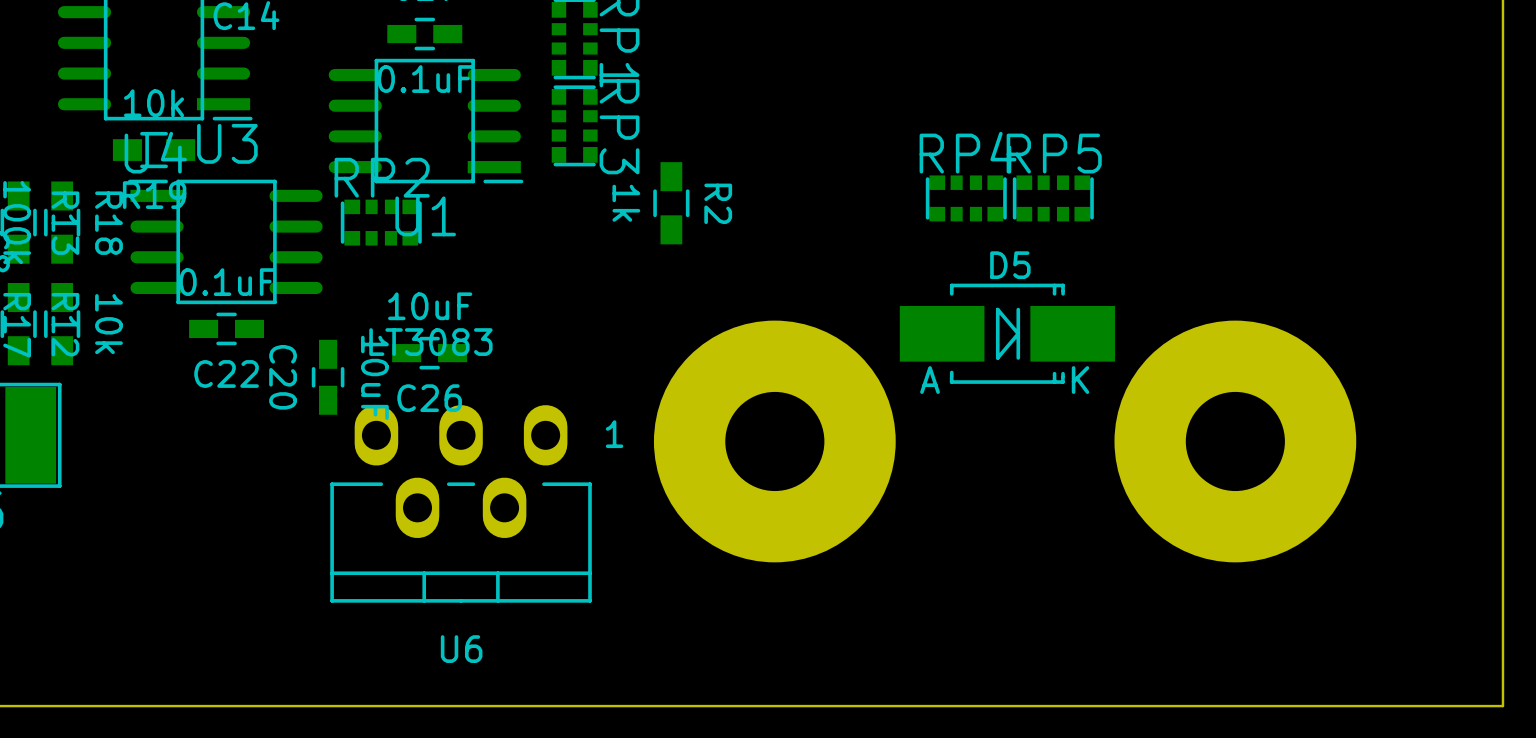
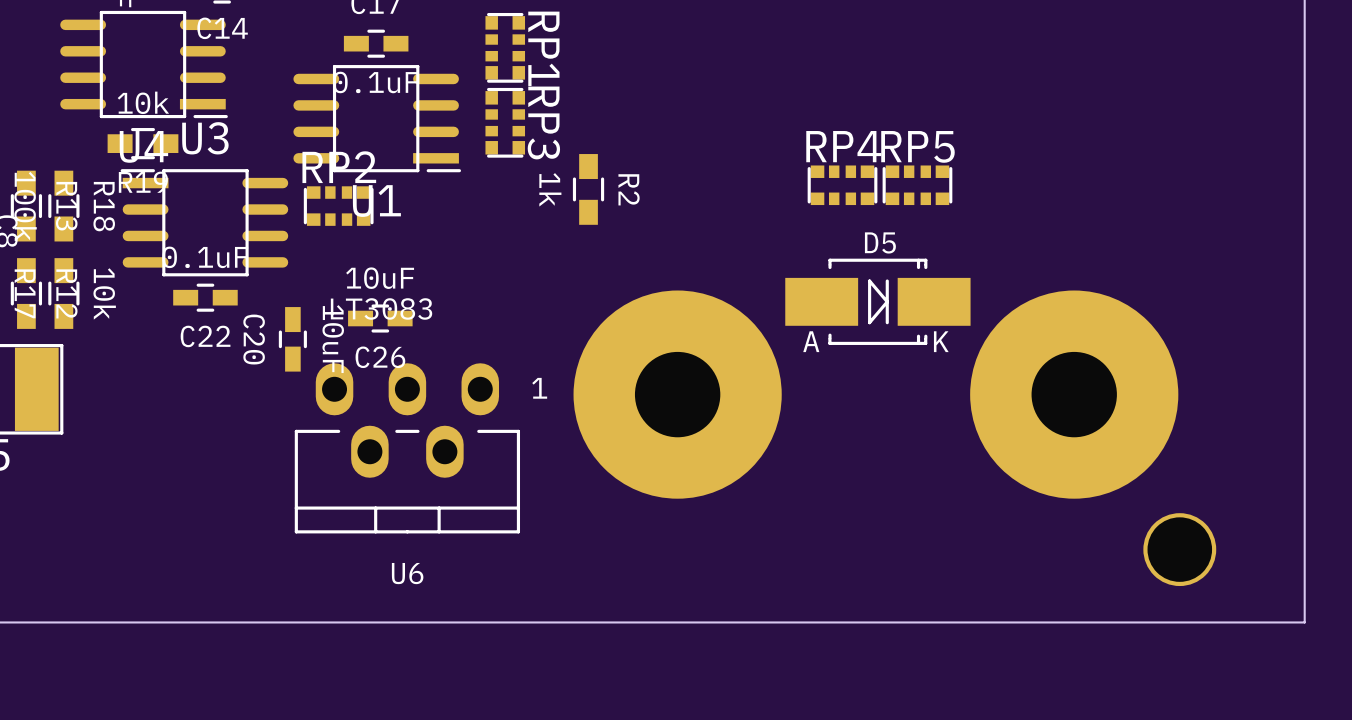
part: none -> (1179, 549)

